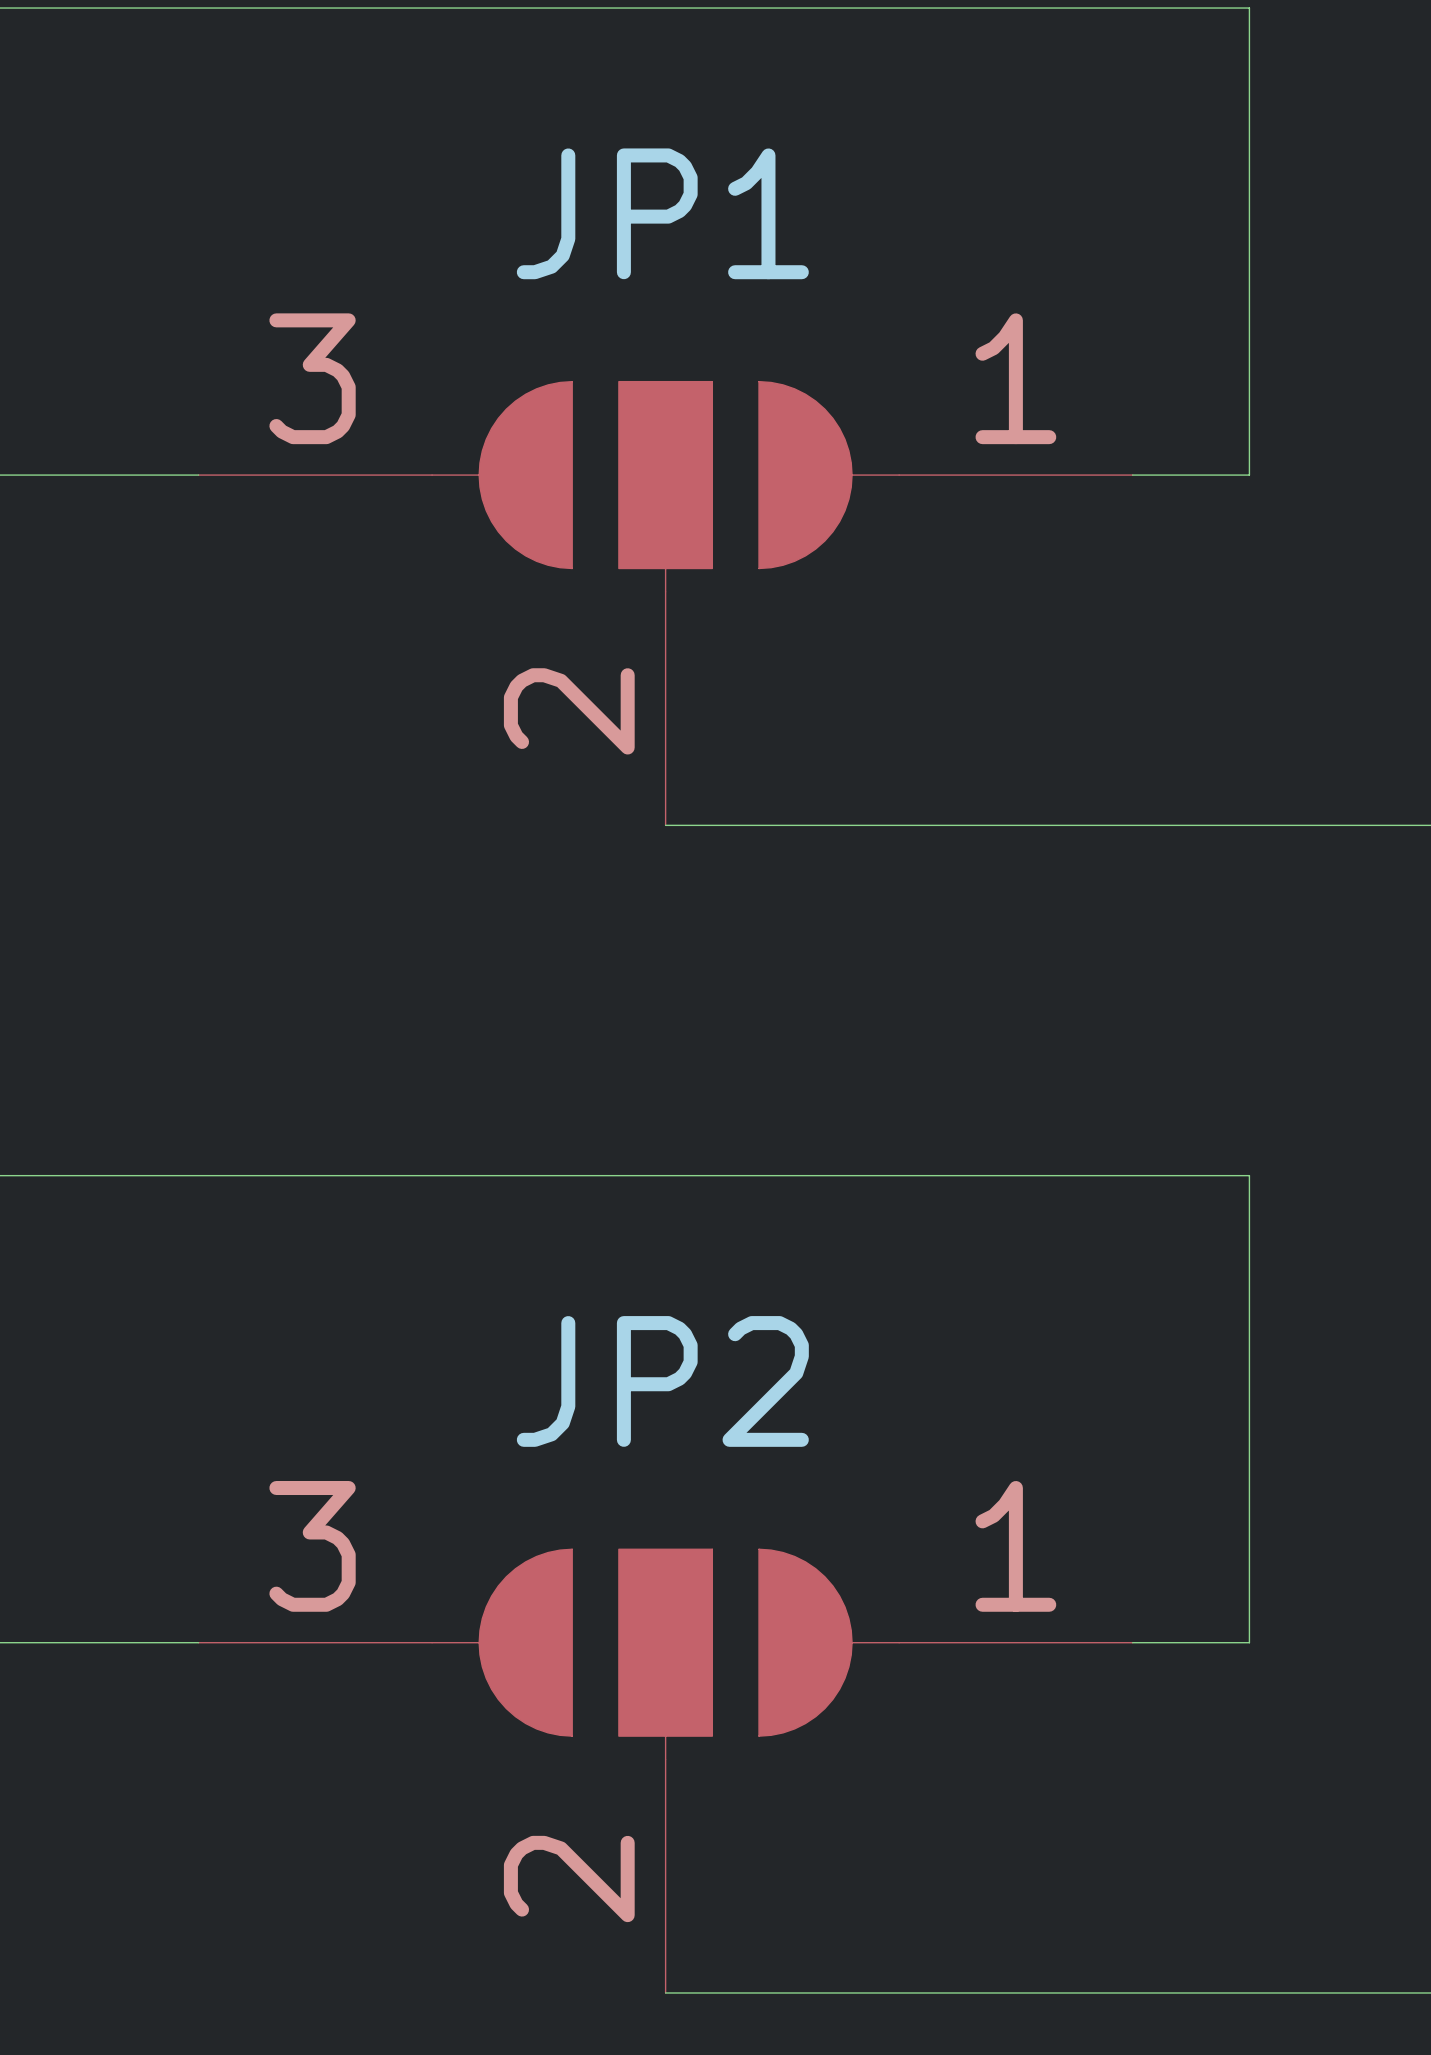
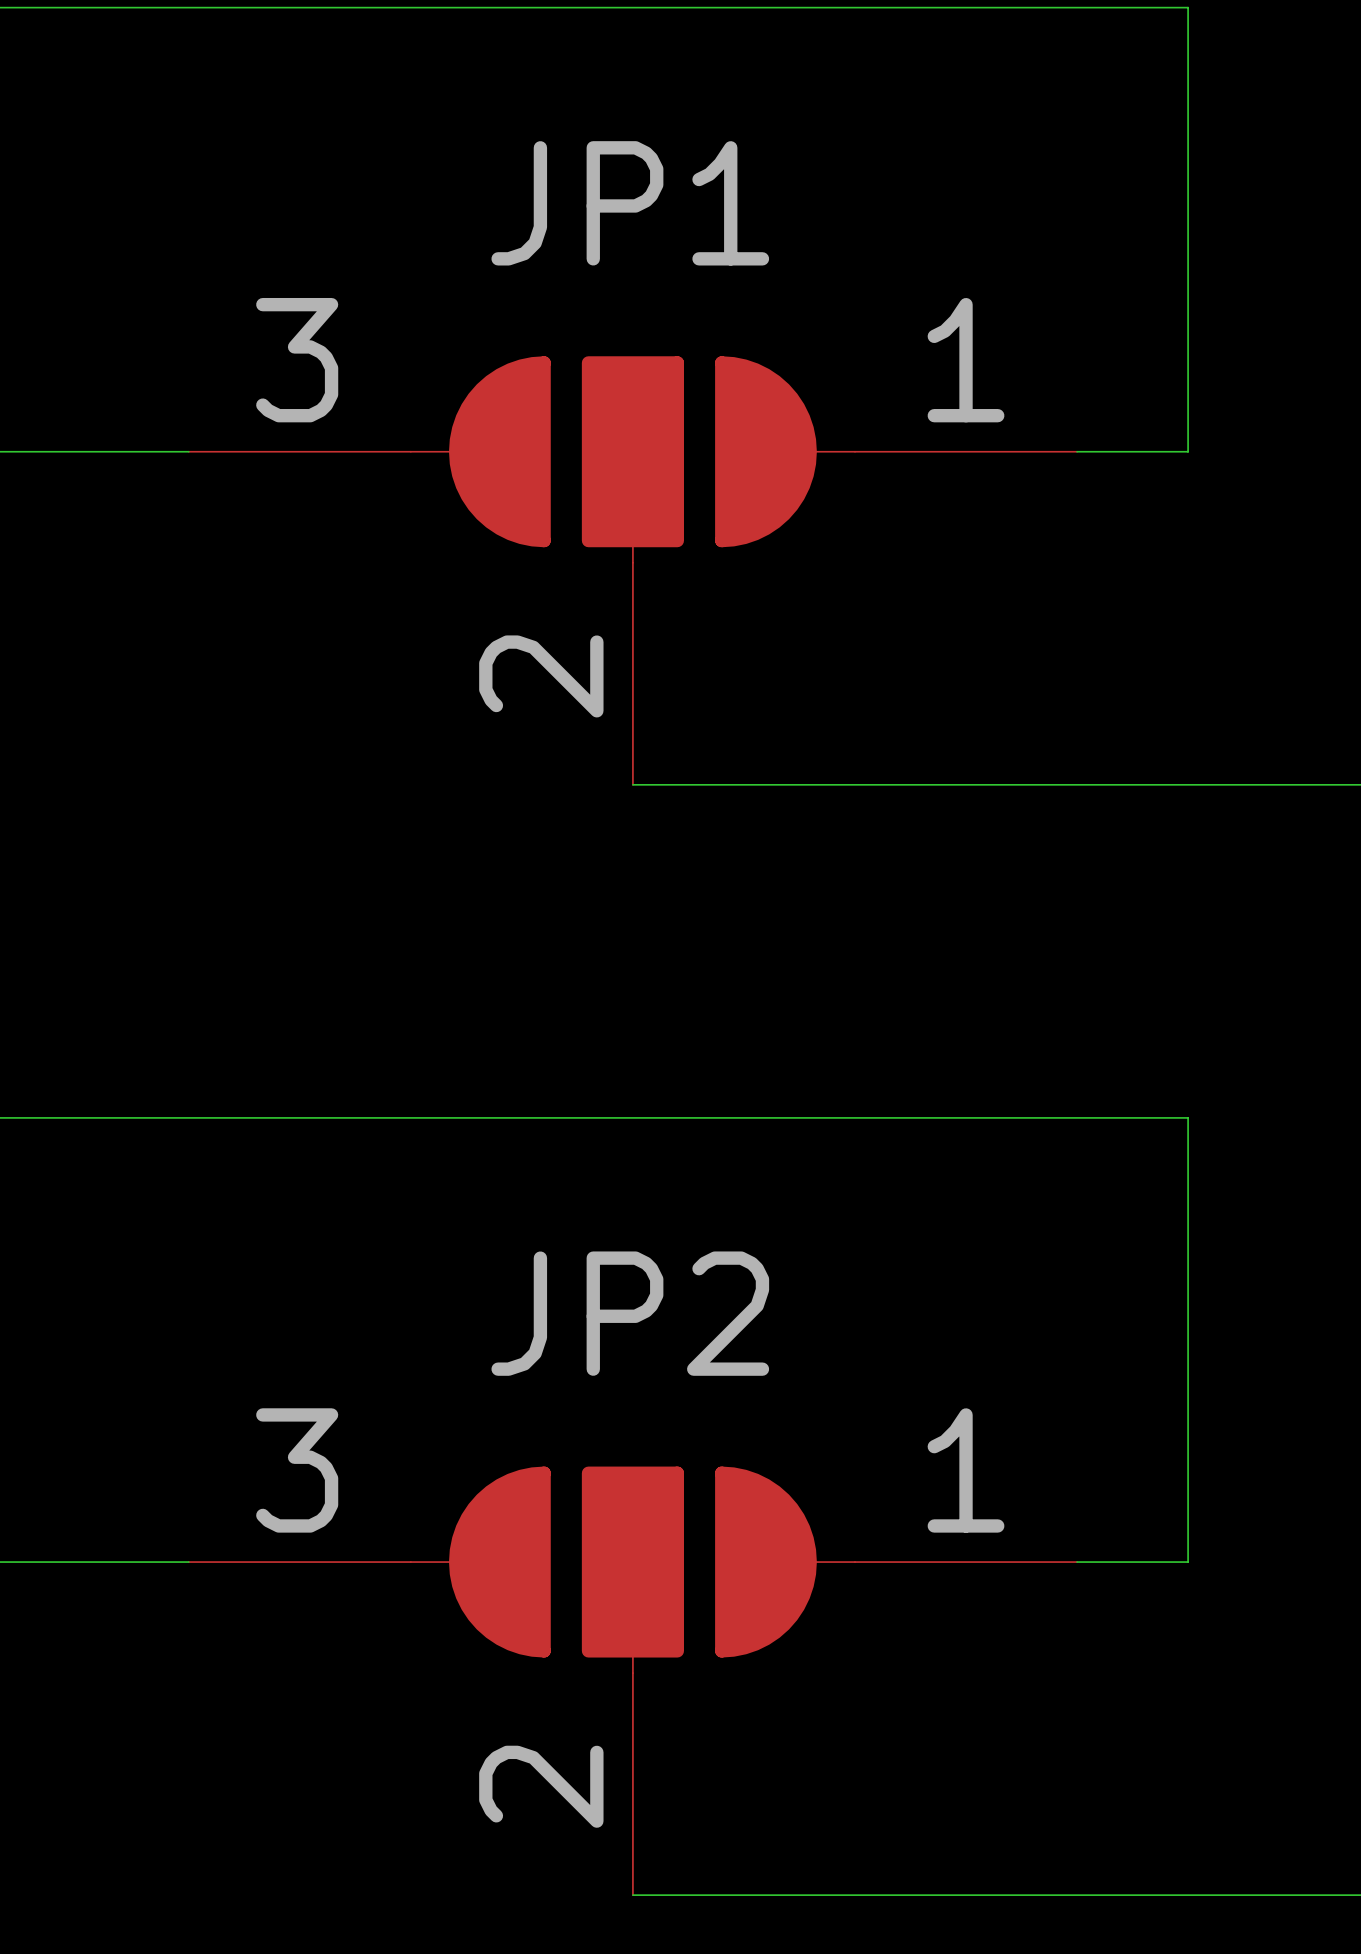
JP1 symbol: [198, 381, 1133, 826] -> [188, 356, 1078, 785]
JP2 symbol: [198, 1549, 1133, 1993] -> [188, 1466, 1078, 1896]

